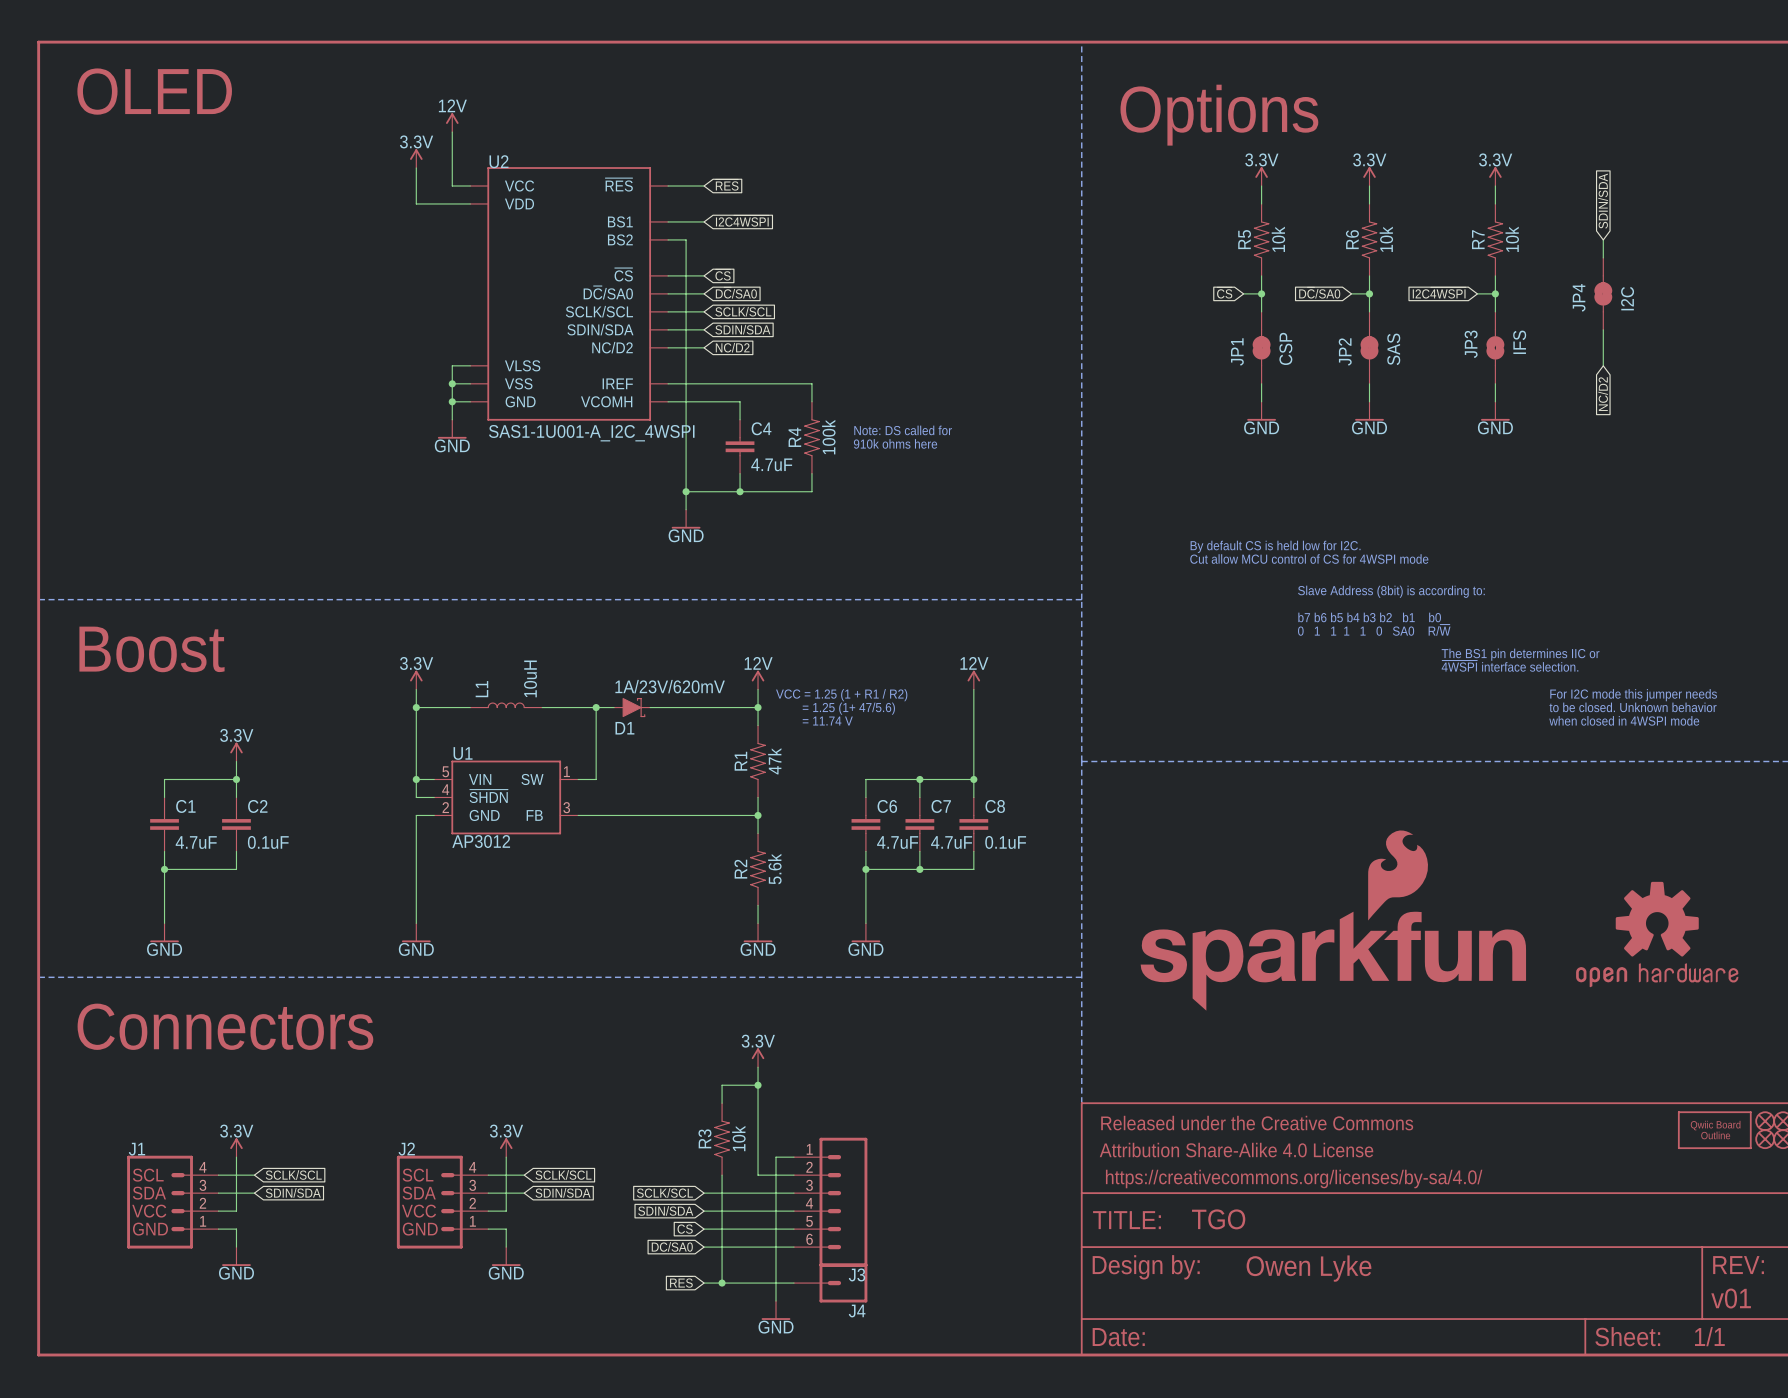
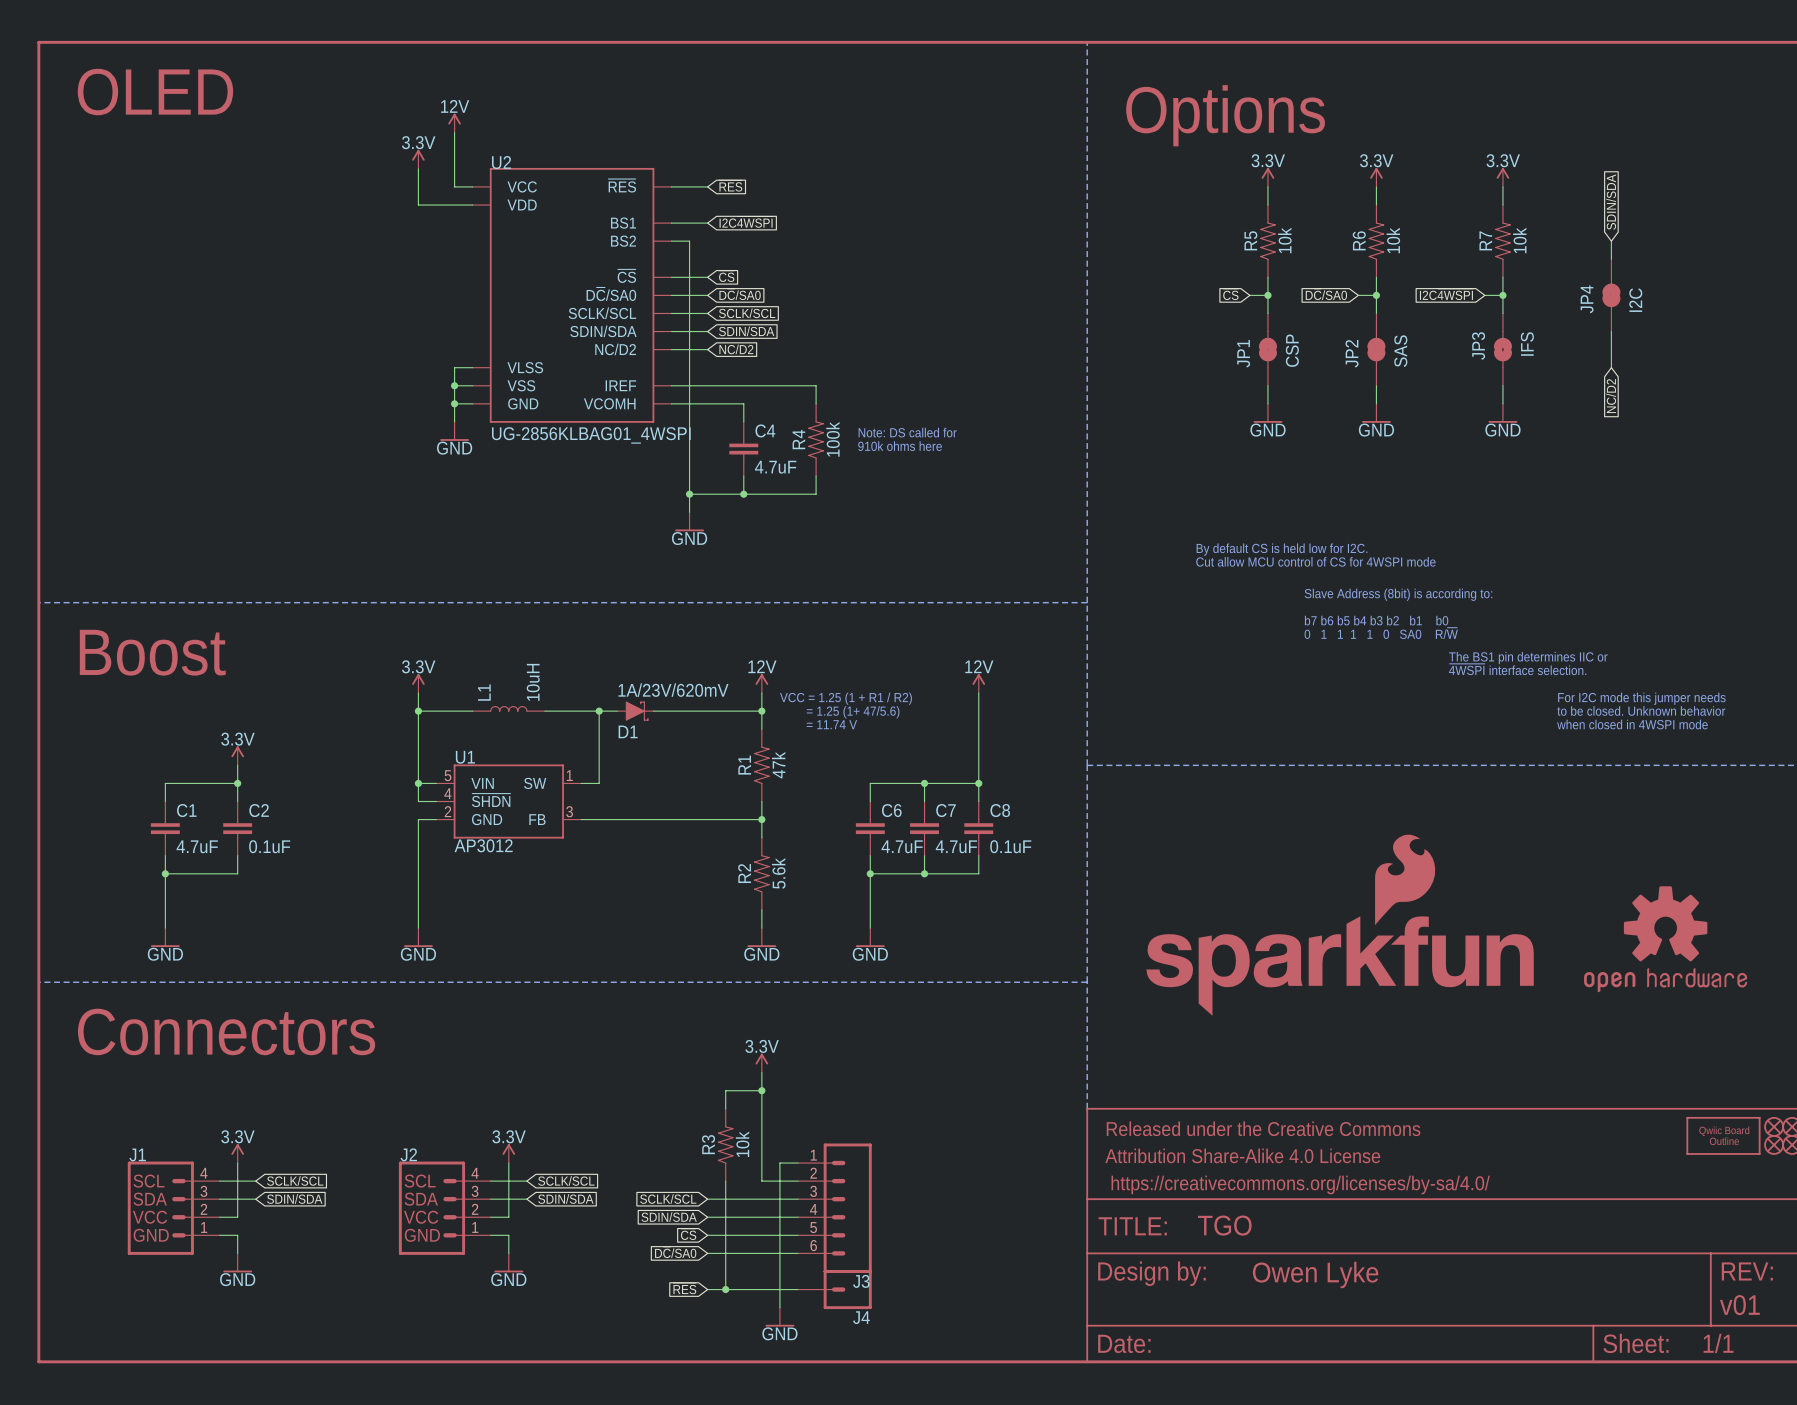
U2 value: SAS1-1U001-A_I2C_4WSPI (591, 433) -> UG-2856KLBAG01_4WSPI (591, 435)

